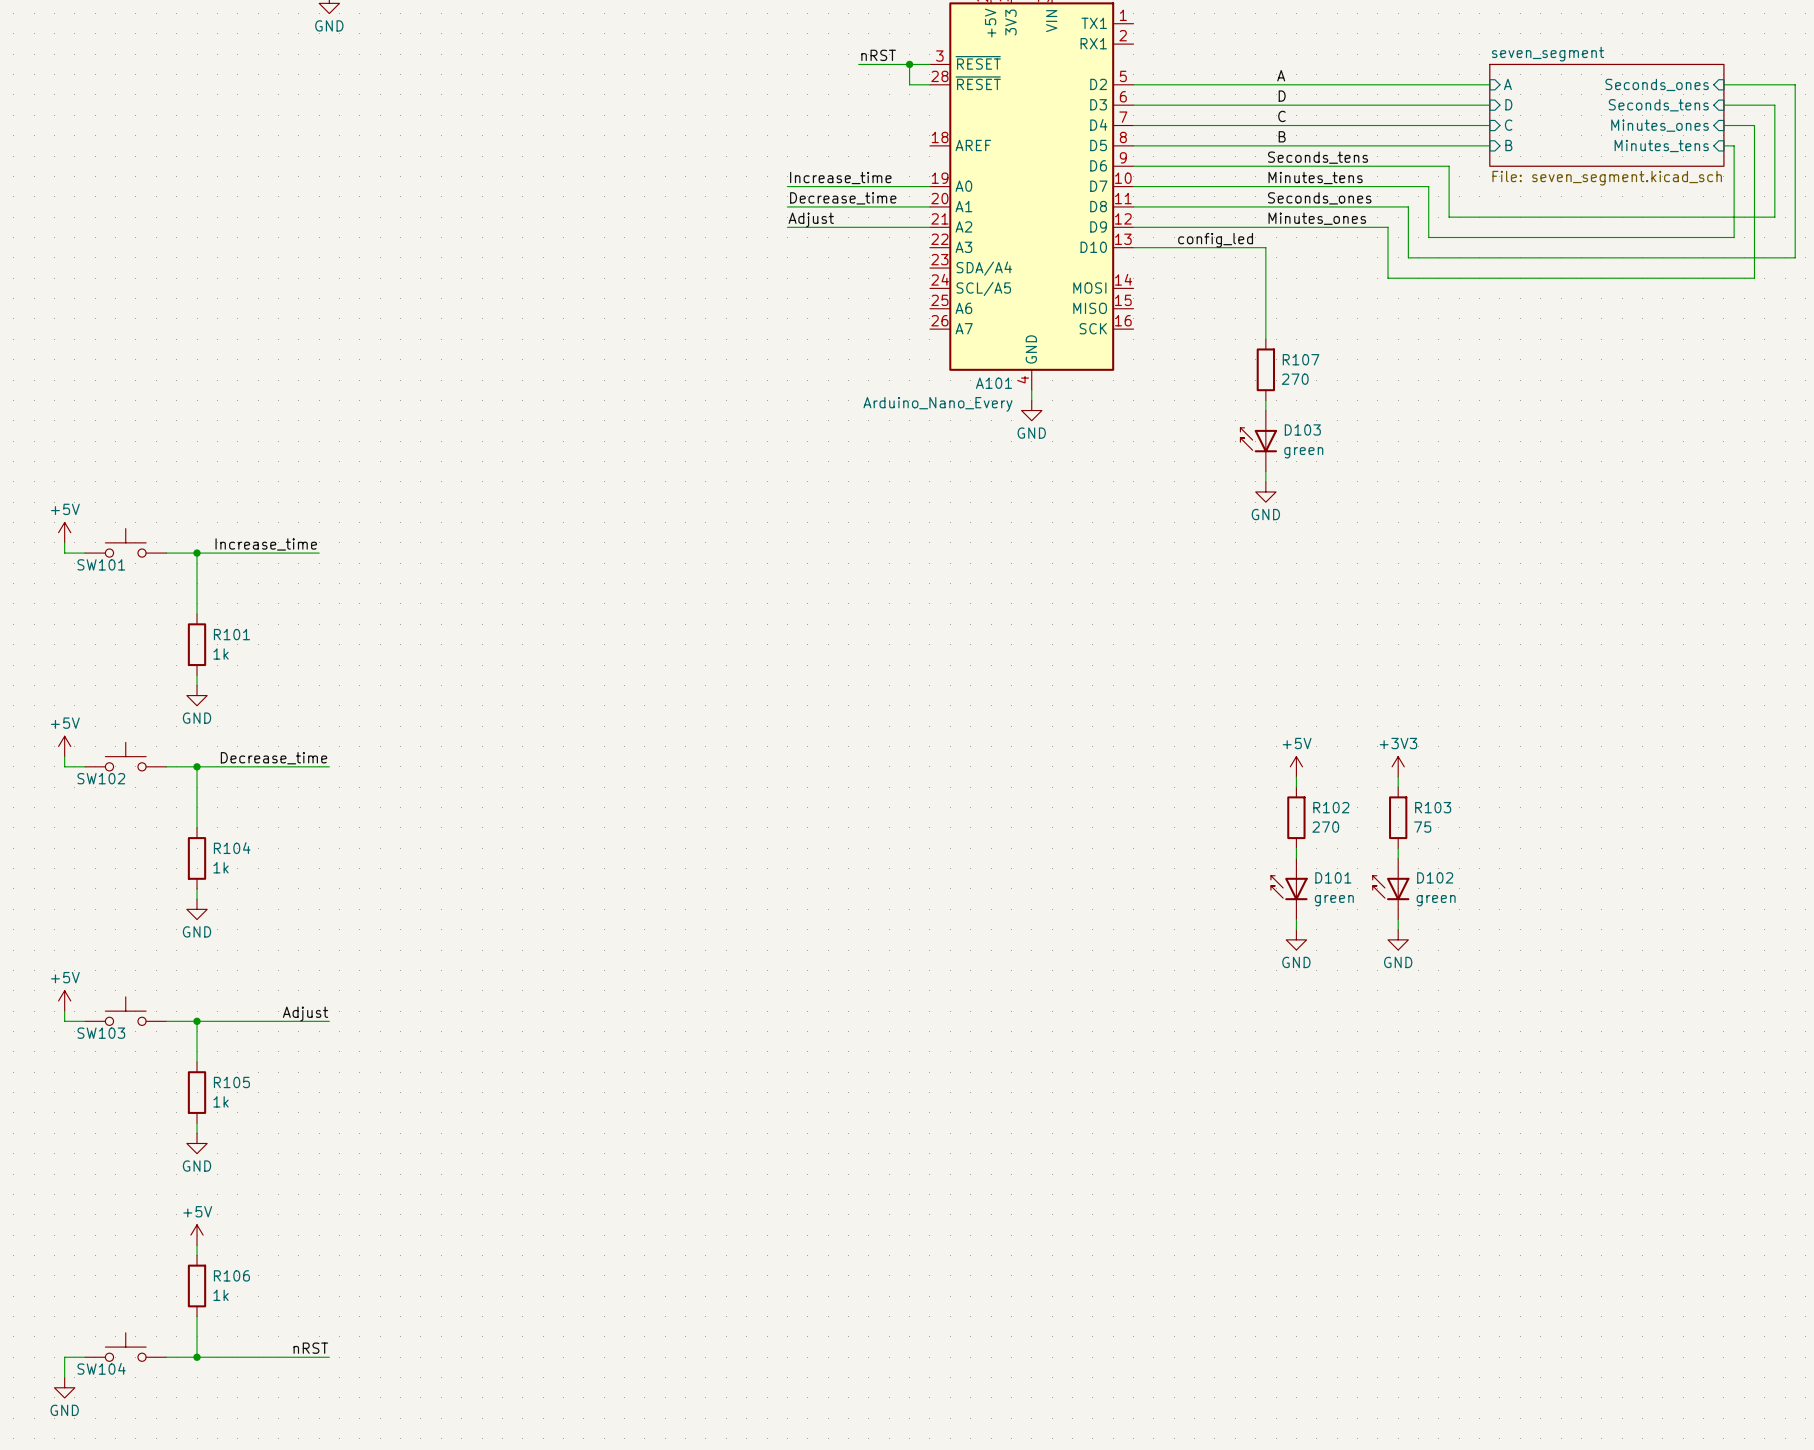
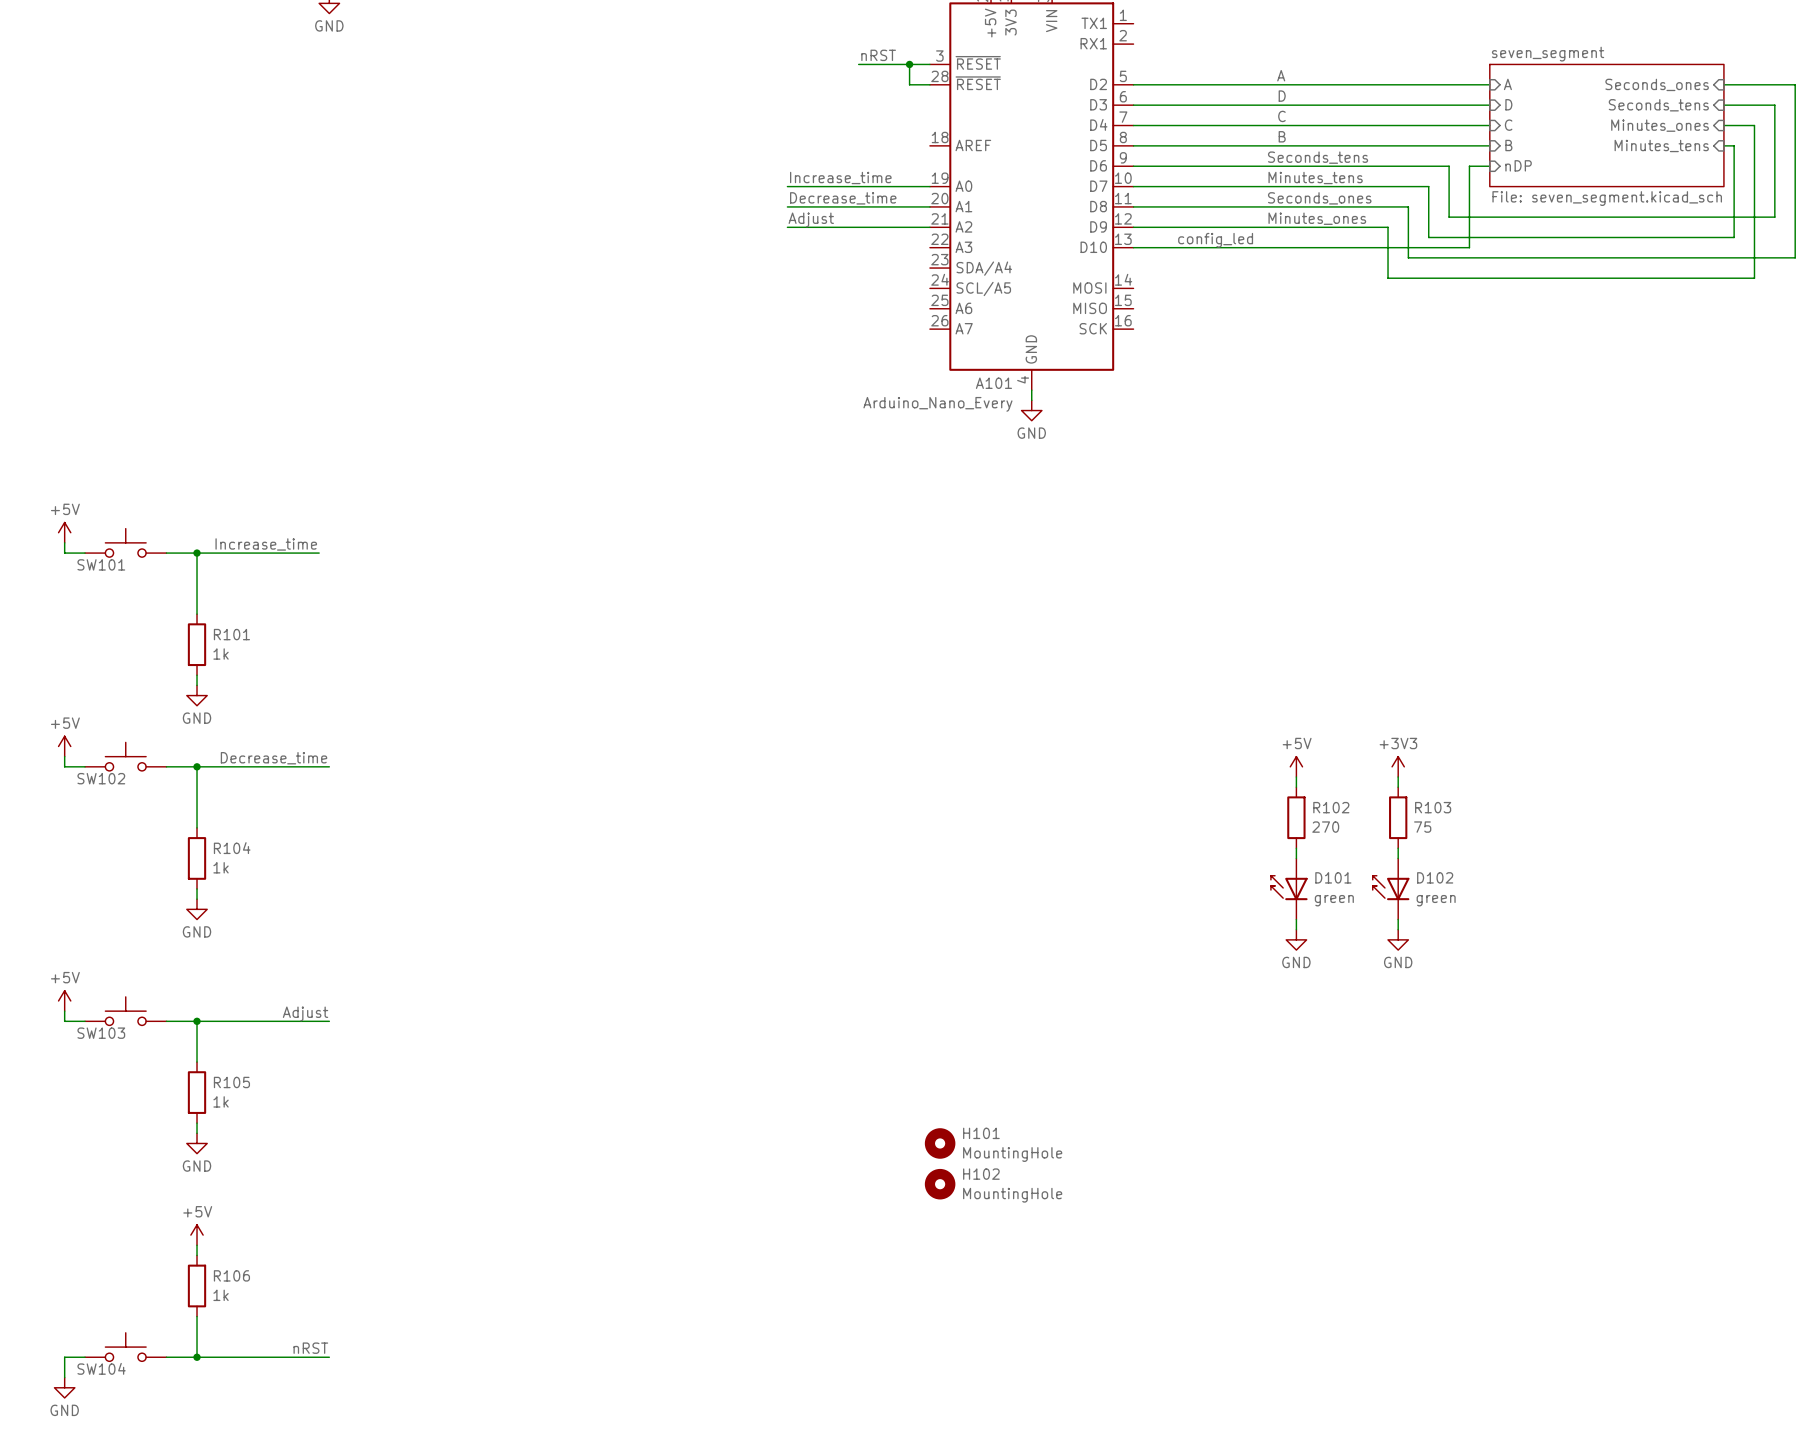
sheet seven_segment: File: seven_segment.kicad_sch (1606, 115) -> none
sheet seven_segment: none -> File: seven_segment.kicad_sch (1606, 125)
sheet pin: none -> nDP (1518, 165)
wire: (1265, 247) (1265, 339) -> (1265, 247) (1469, 247) (1469, 166) (1489, 166)
R107: 270 (1265, 369) -> none
wire: (1265, 400) (1265, 410) -> none
D103: green (1258, 441) -> none
wire: (1265, 471) (1265, 481) -> none
power symbol: GND (1265, 491) -> none
H101: none -> MountingHole (940, 1143)
H102: none -> MountingHole (940, 1184)

